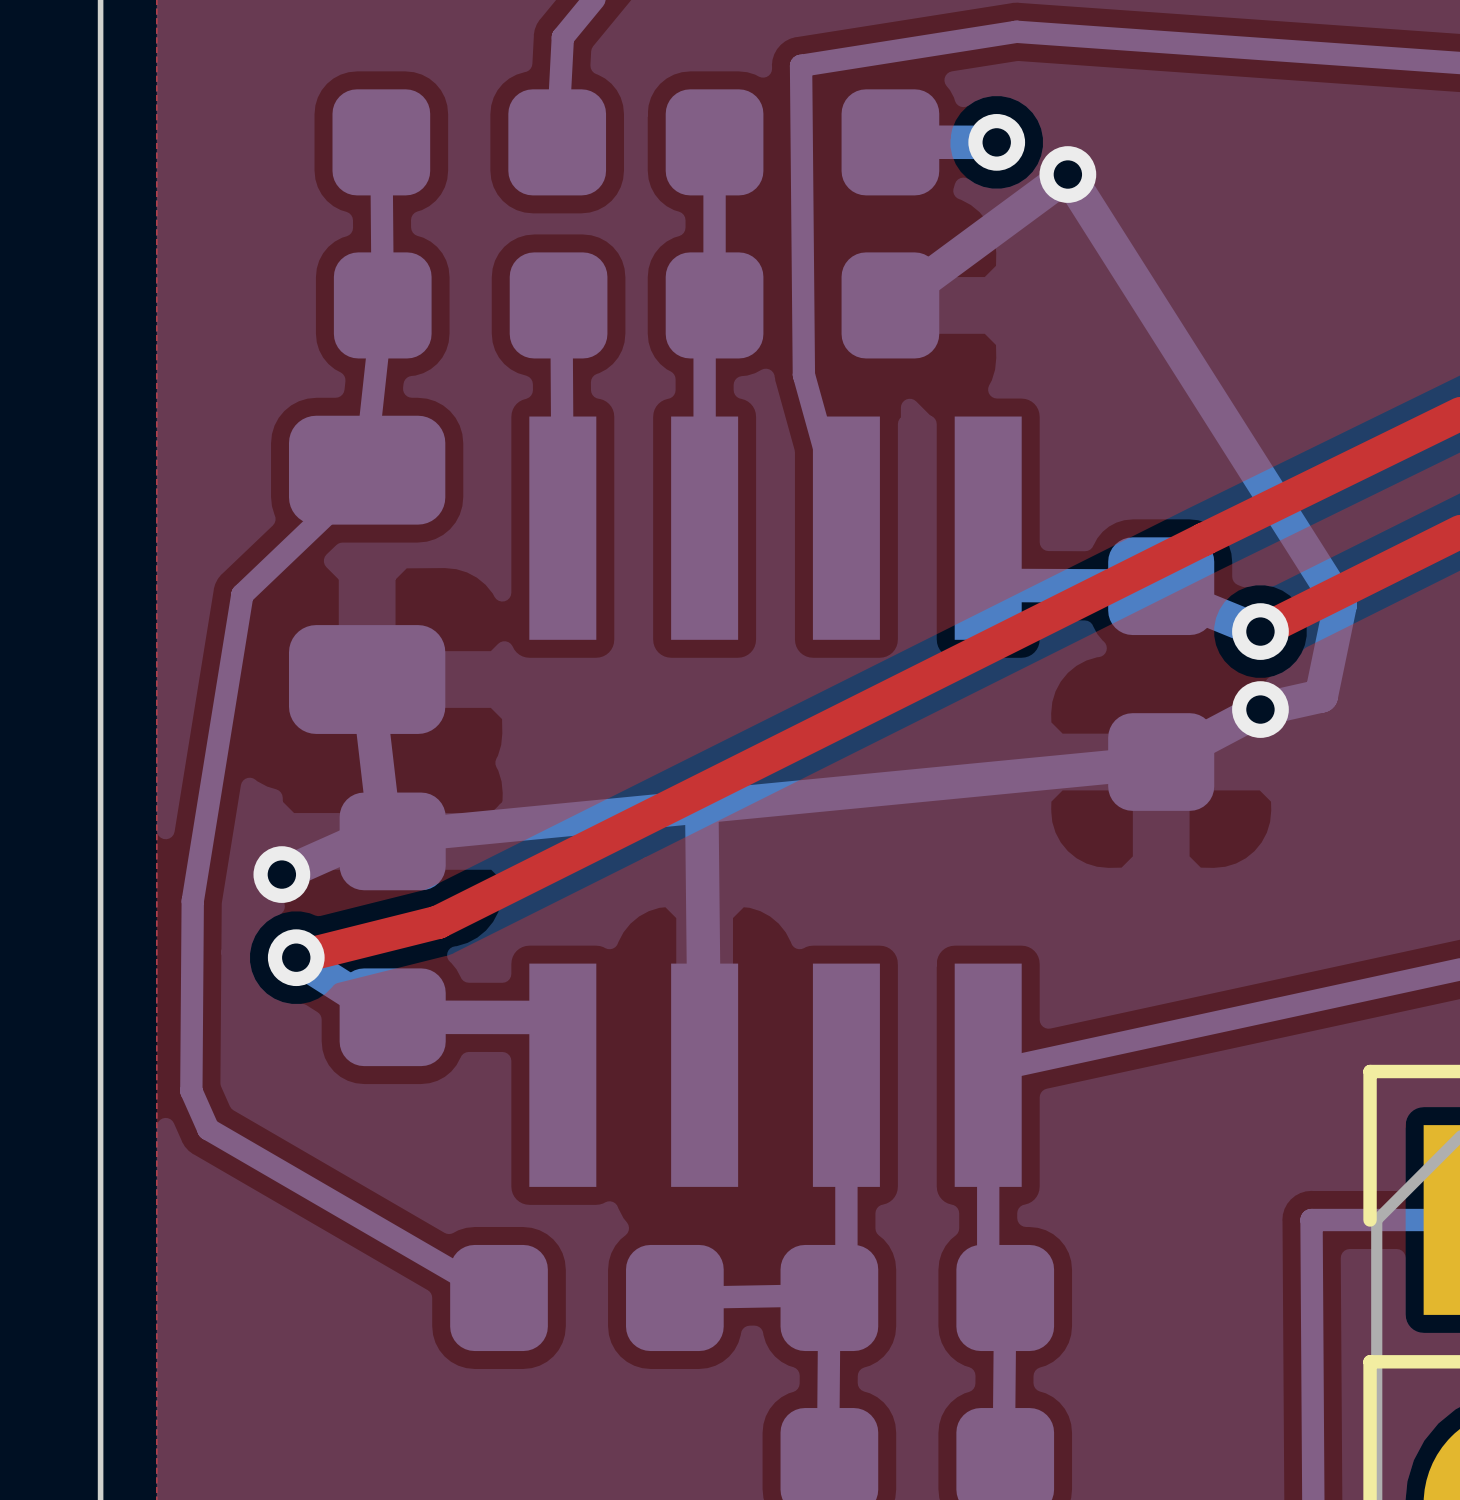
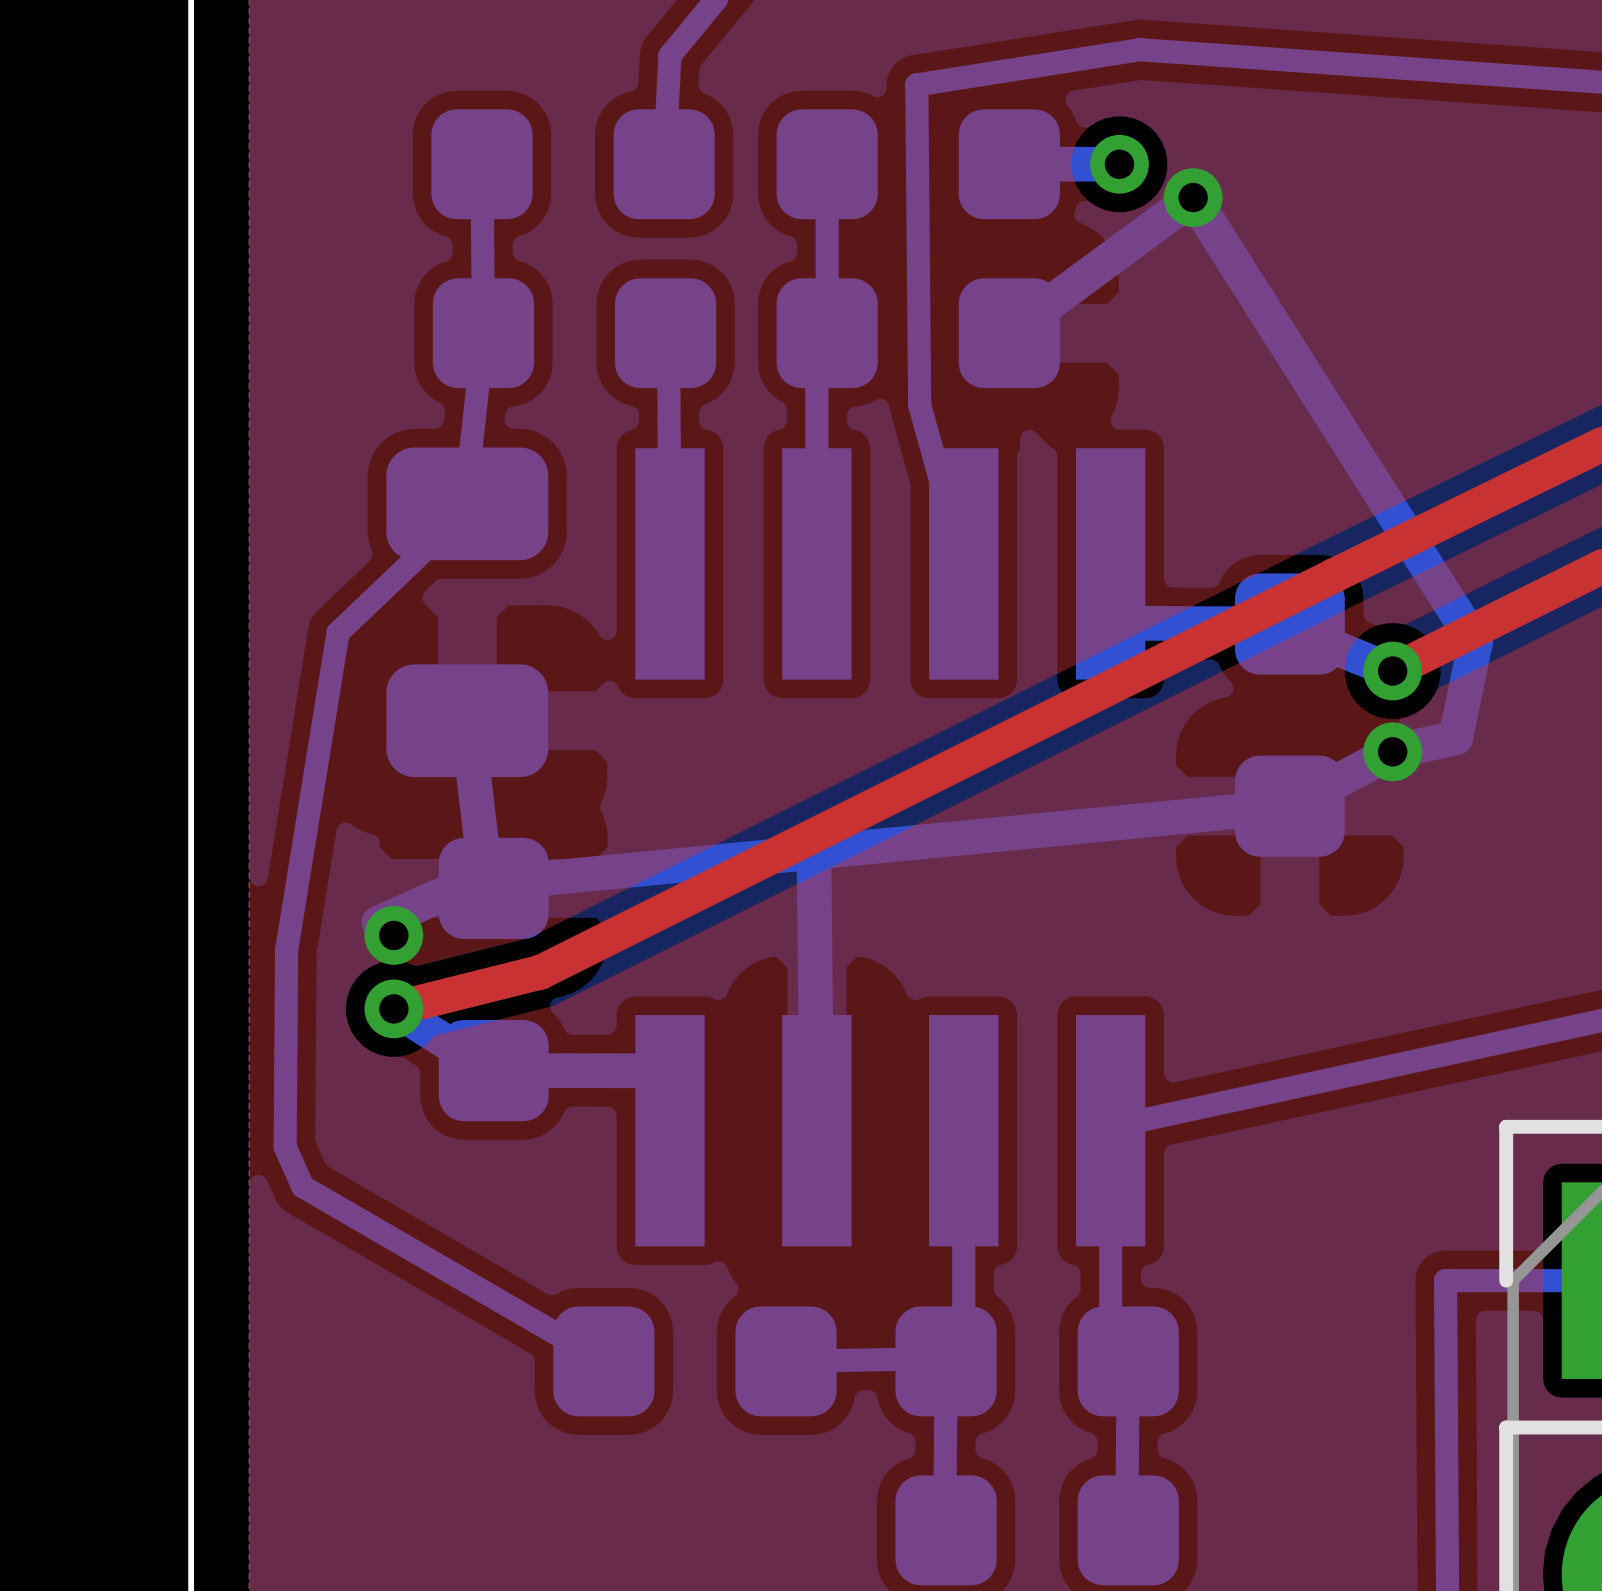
via position: (281, 874) -> (393, 935)

